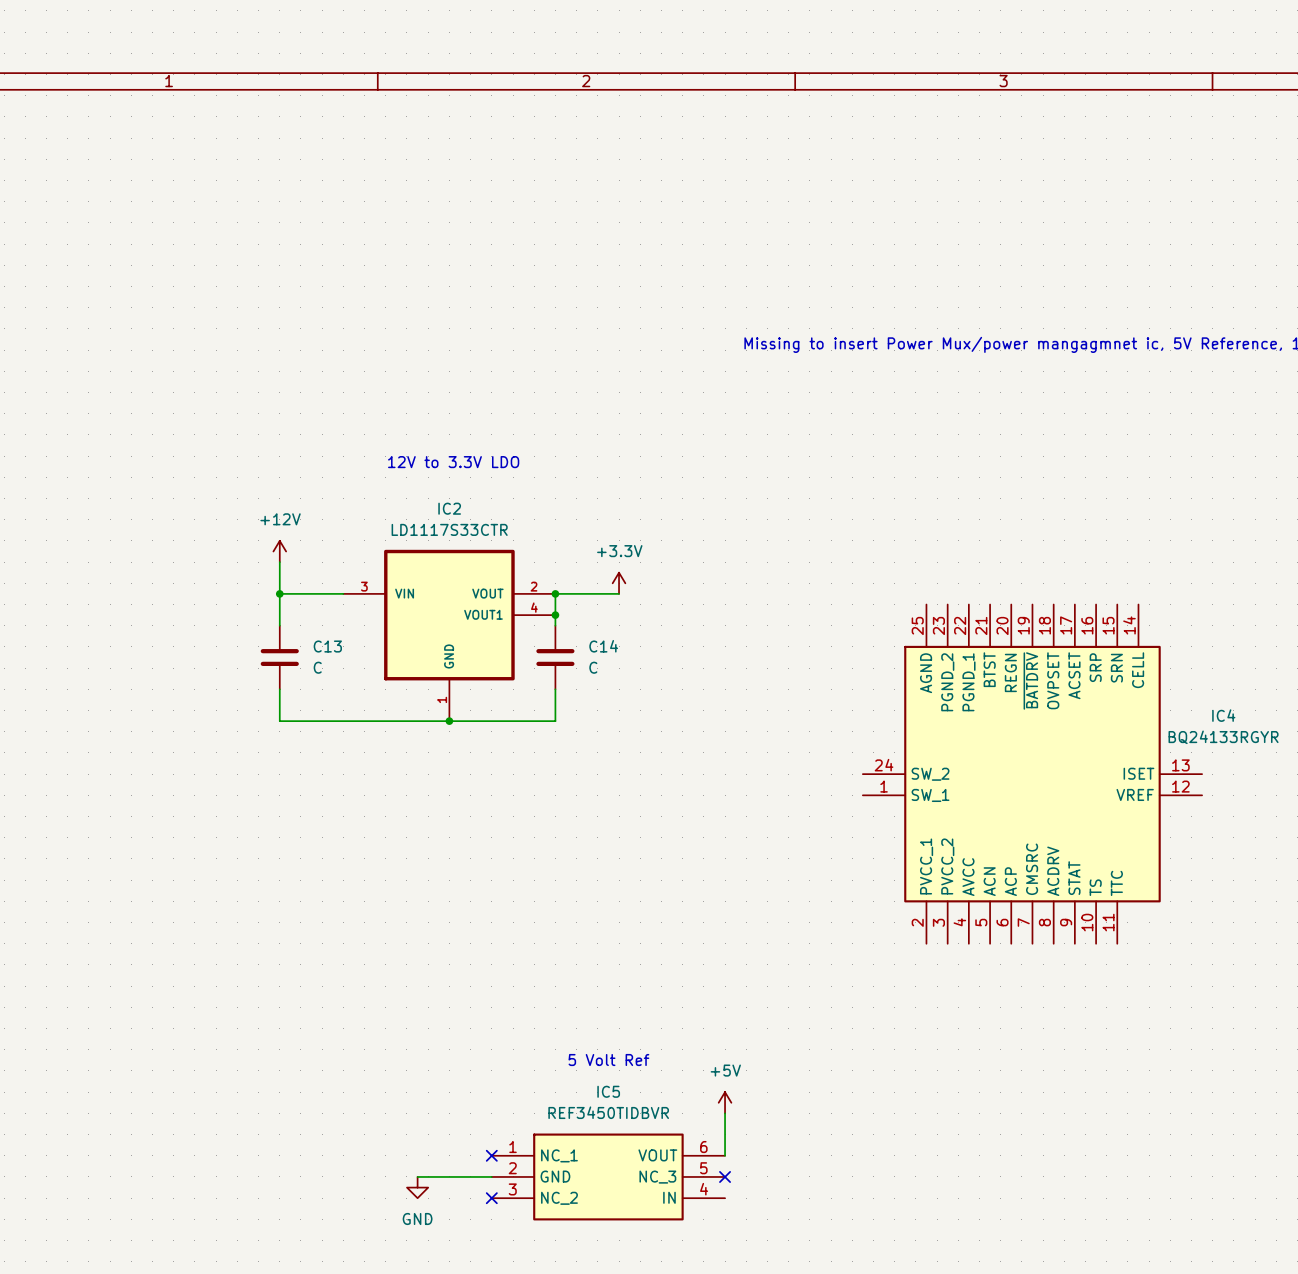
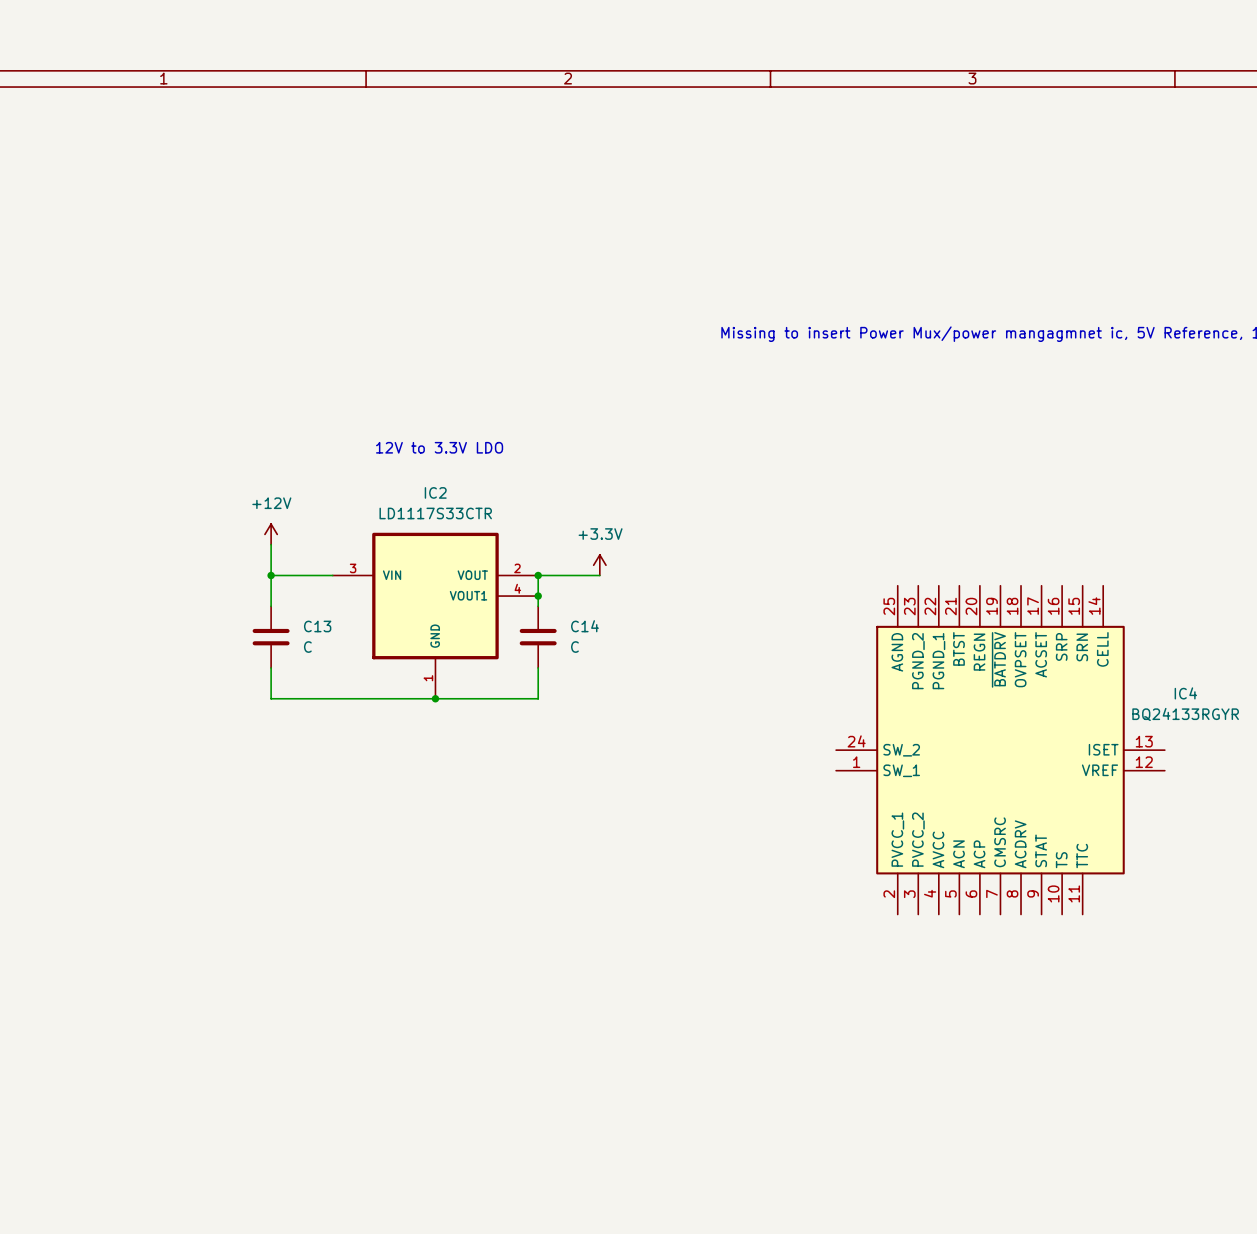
text: 5 Volt Ref (608, 1060) -> none
power symbol: +5V (725, 1102) -> none
wire: (725, 1113) (725, 1155) -> none
no-connect mark: (491, 1155) -> none
wire: (417, 1176) (491, 1176) -> none
IC5: REF3450TIDBVR (608, 1176) -> none
no-connect mark: (725, 1176) -> none
power symbol: GND (417, 1187) -> none
no-connect mark: (491, 1198) -> none

